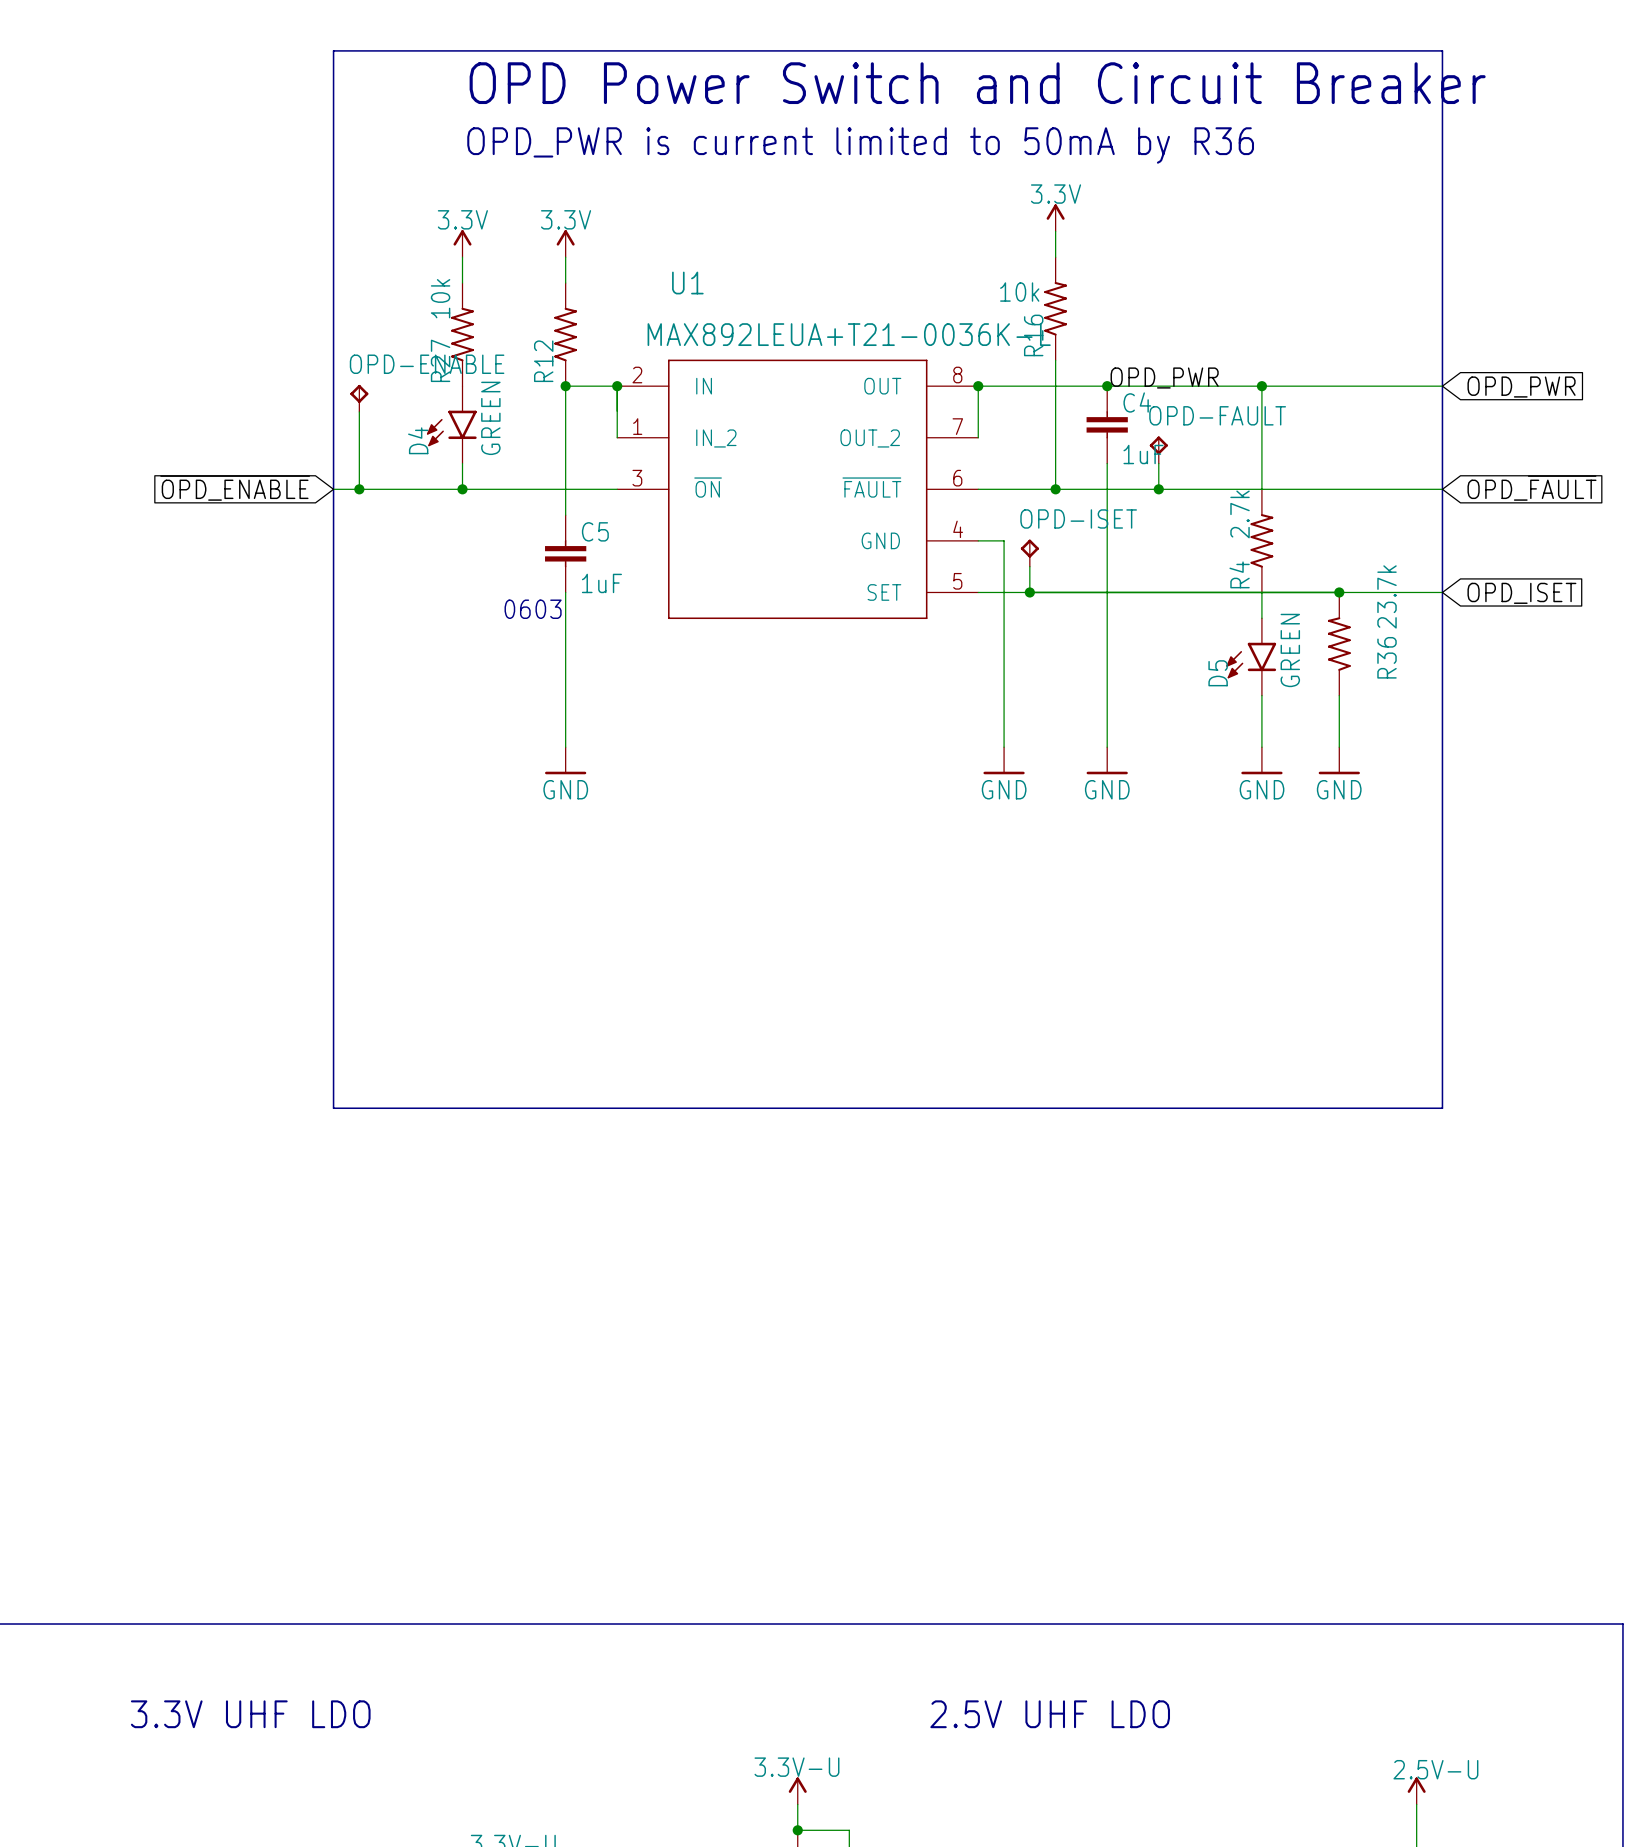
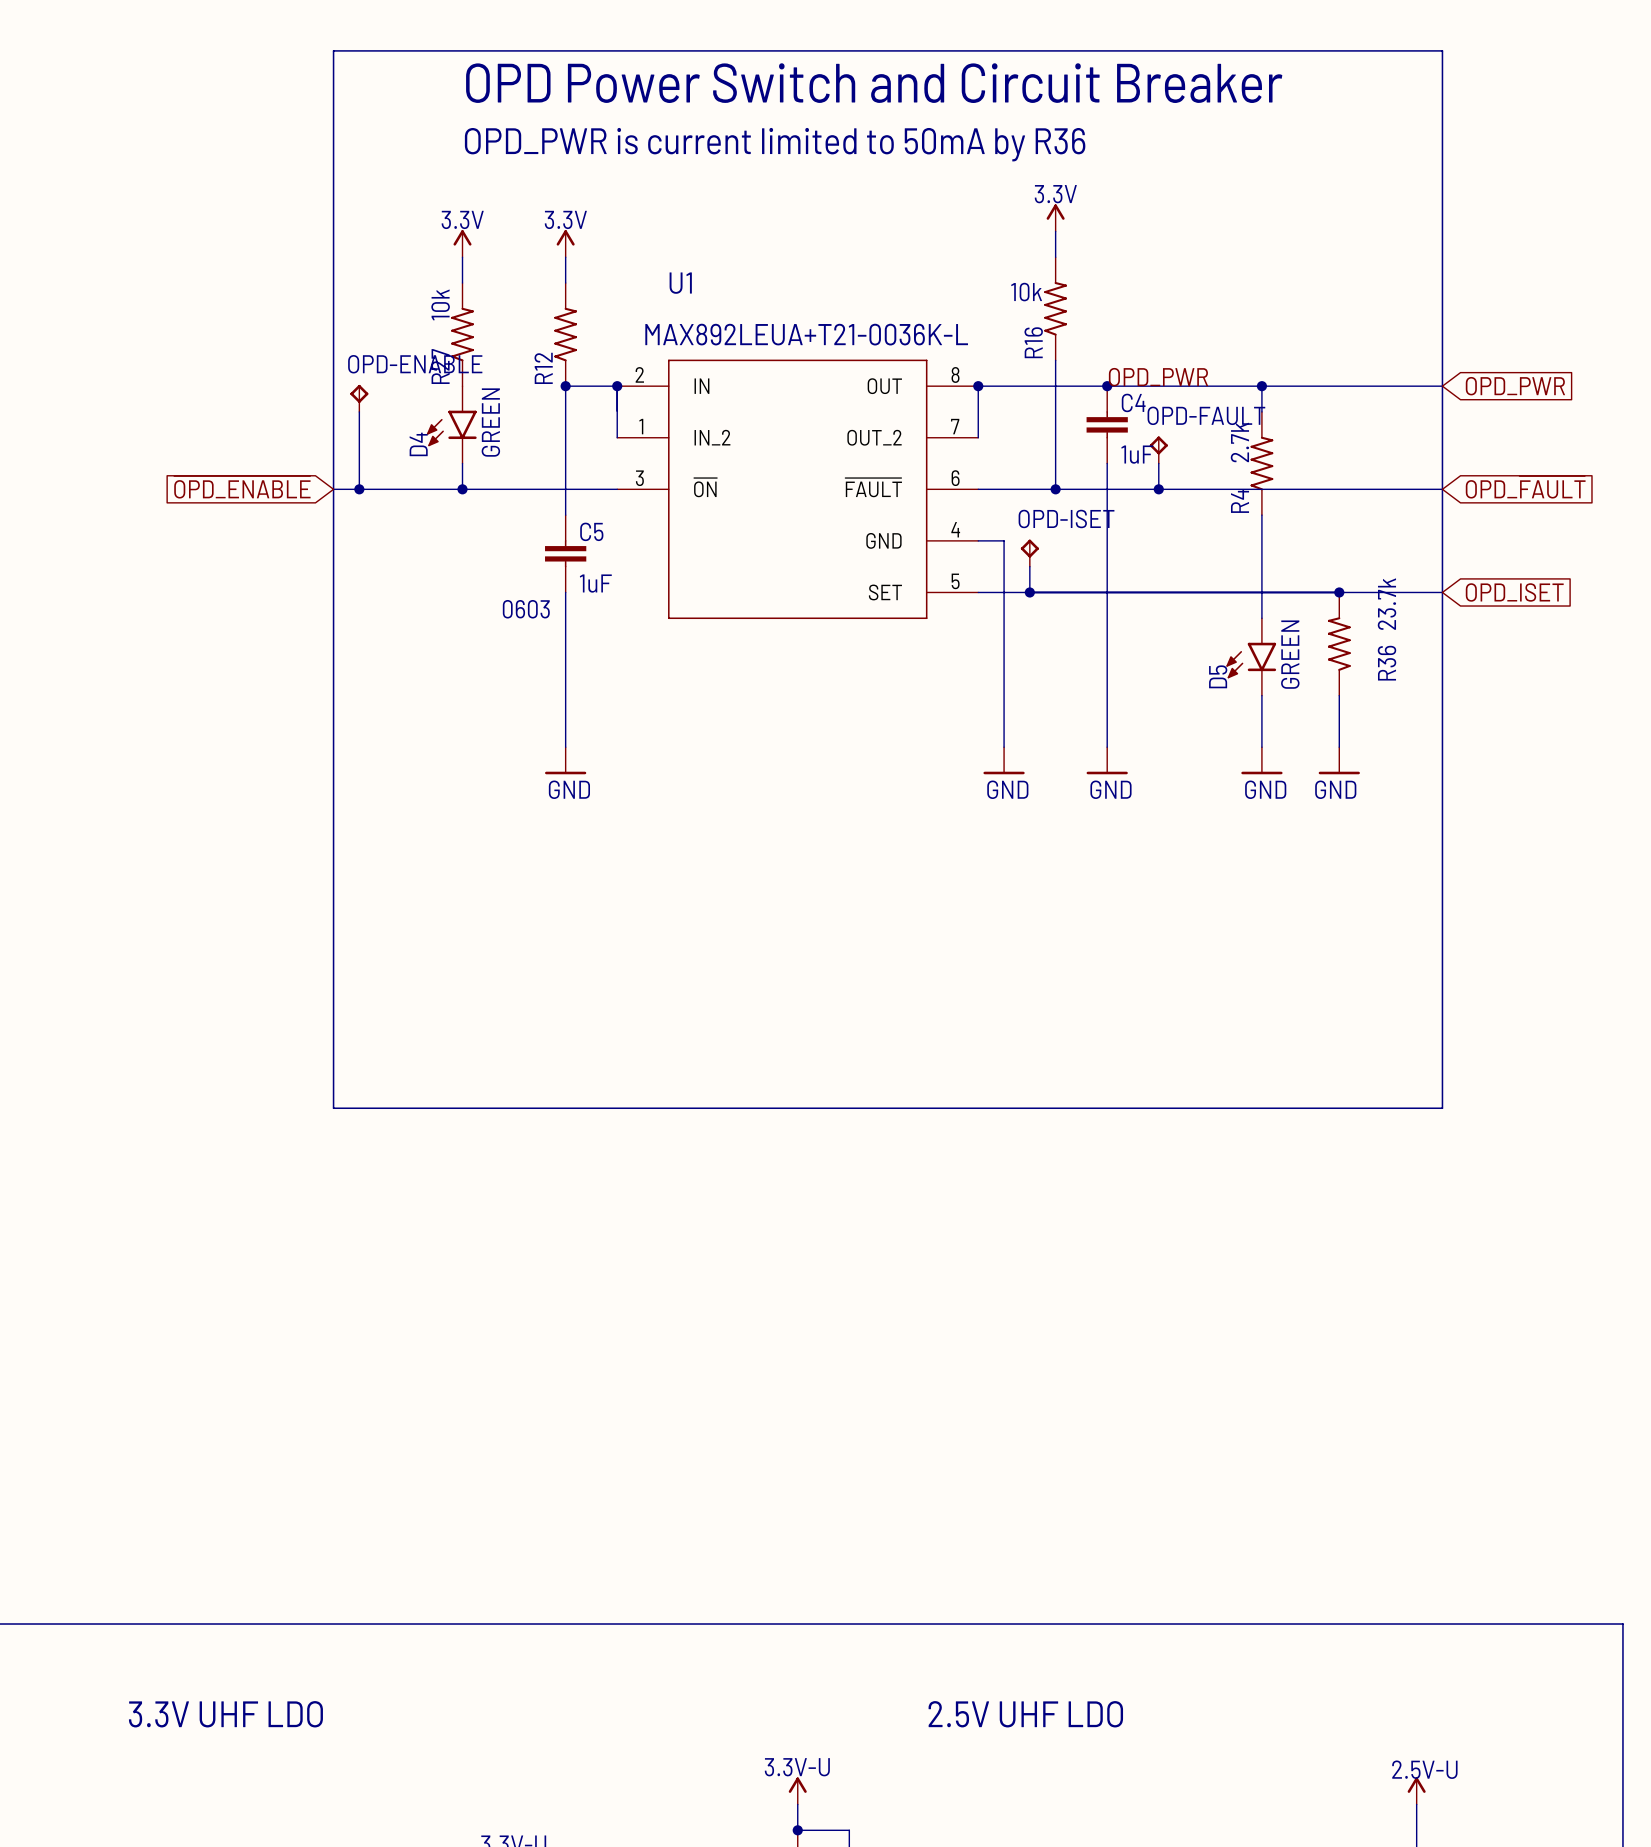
R4 position: (1261, 540) -> (1261, 463)

